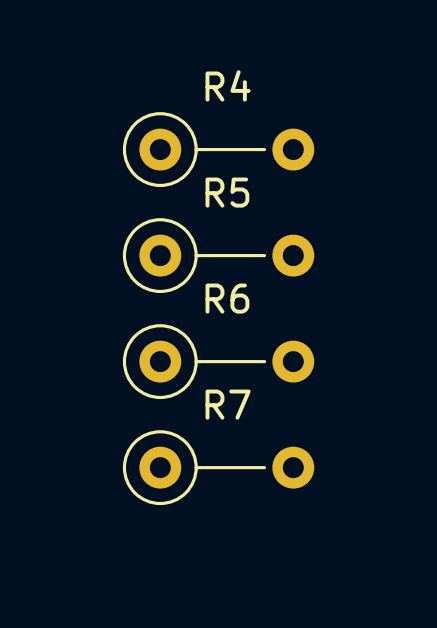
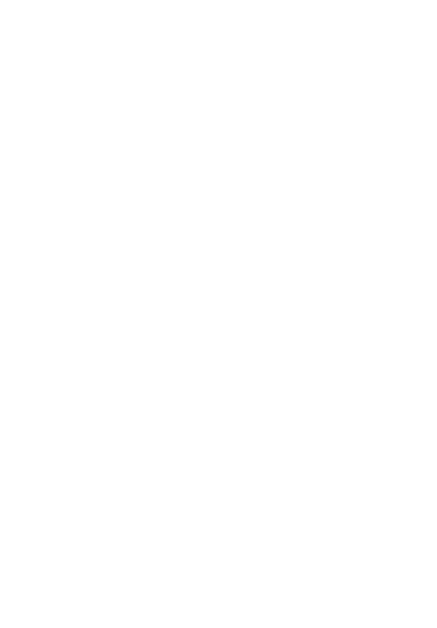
R4: (218, 149) -> none
R5: (218, 255) -> none
R6: (218, 361) -> none
R7: (218, 467) -> none

